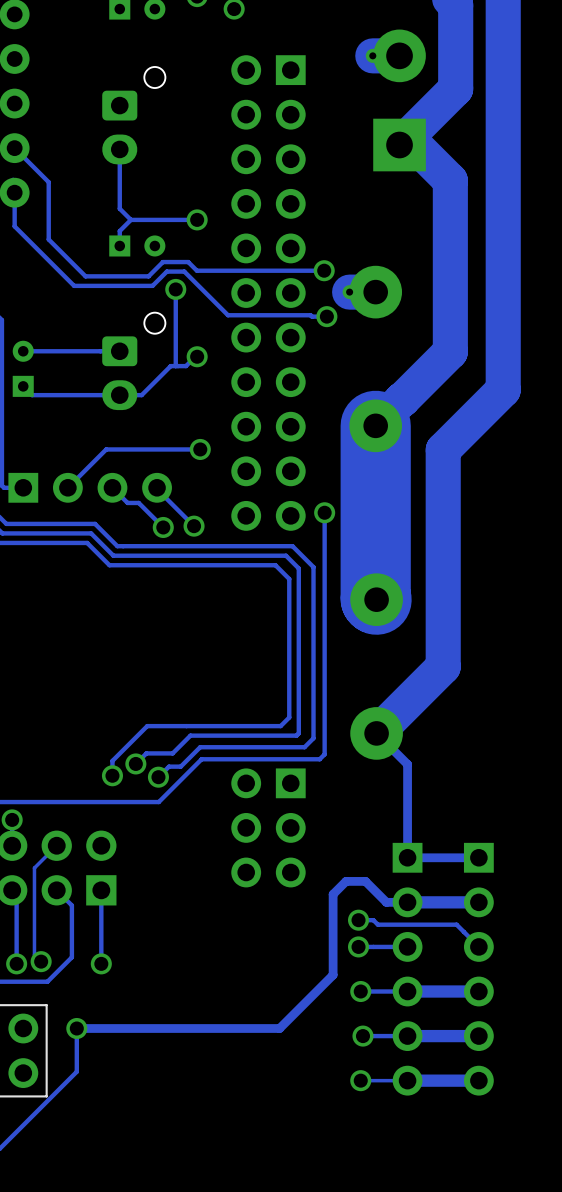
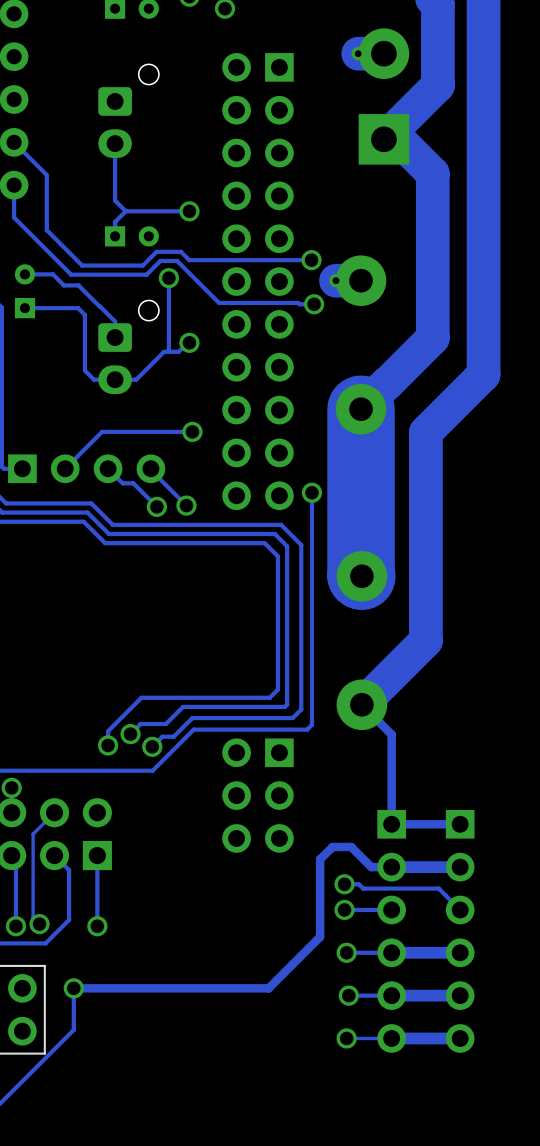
track: (119, 351) (23, 351) -> (115, 337) (115, 321) (78, 285) (63, 285) (52, 274) (24, 274)
part position: (23, 368) -> (24, 291)
track: (23, 386) (32, 395) (97, 395) -> (24, 308) (78, 308) (84, 314) (84, 370) (94, 379)

